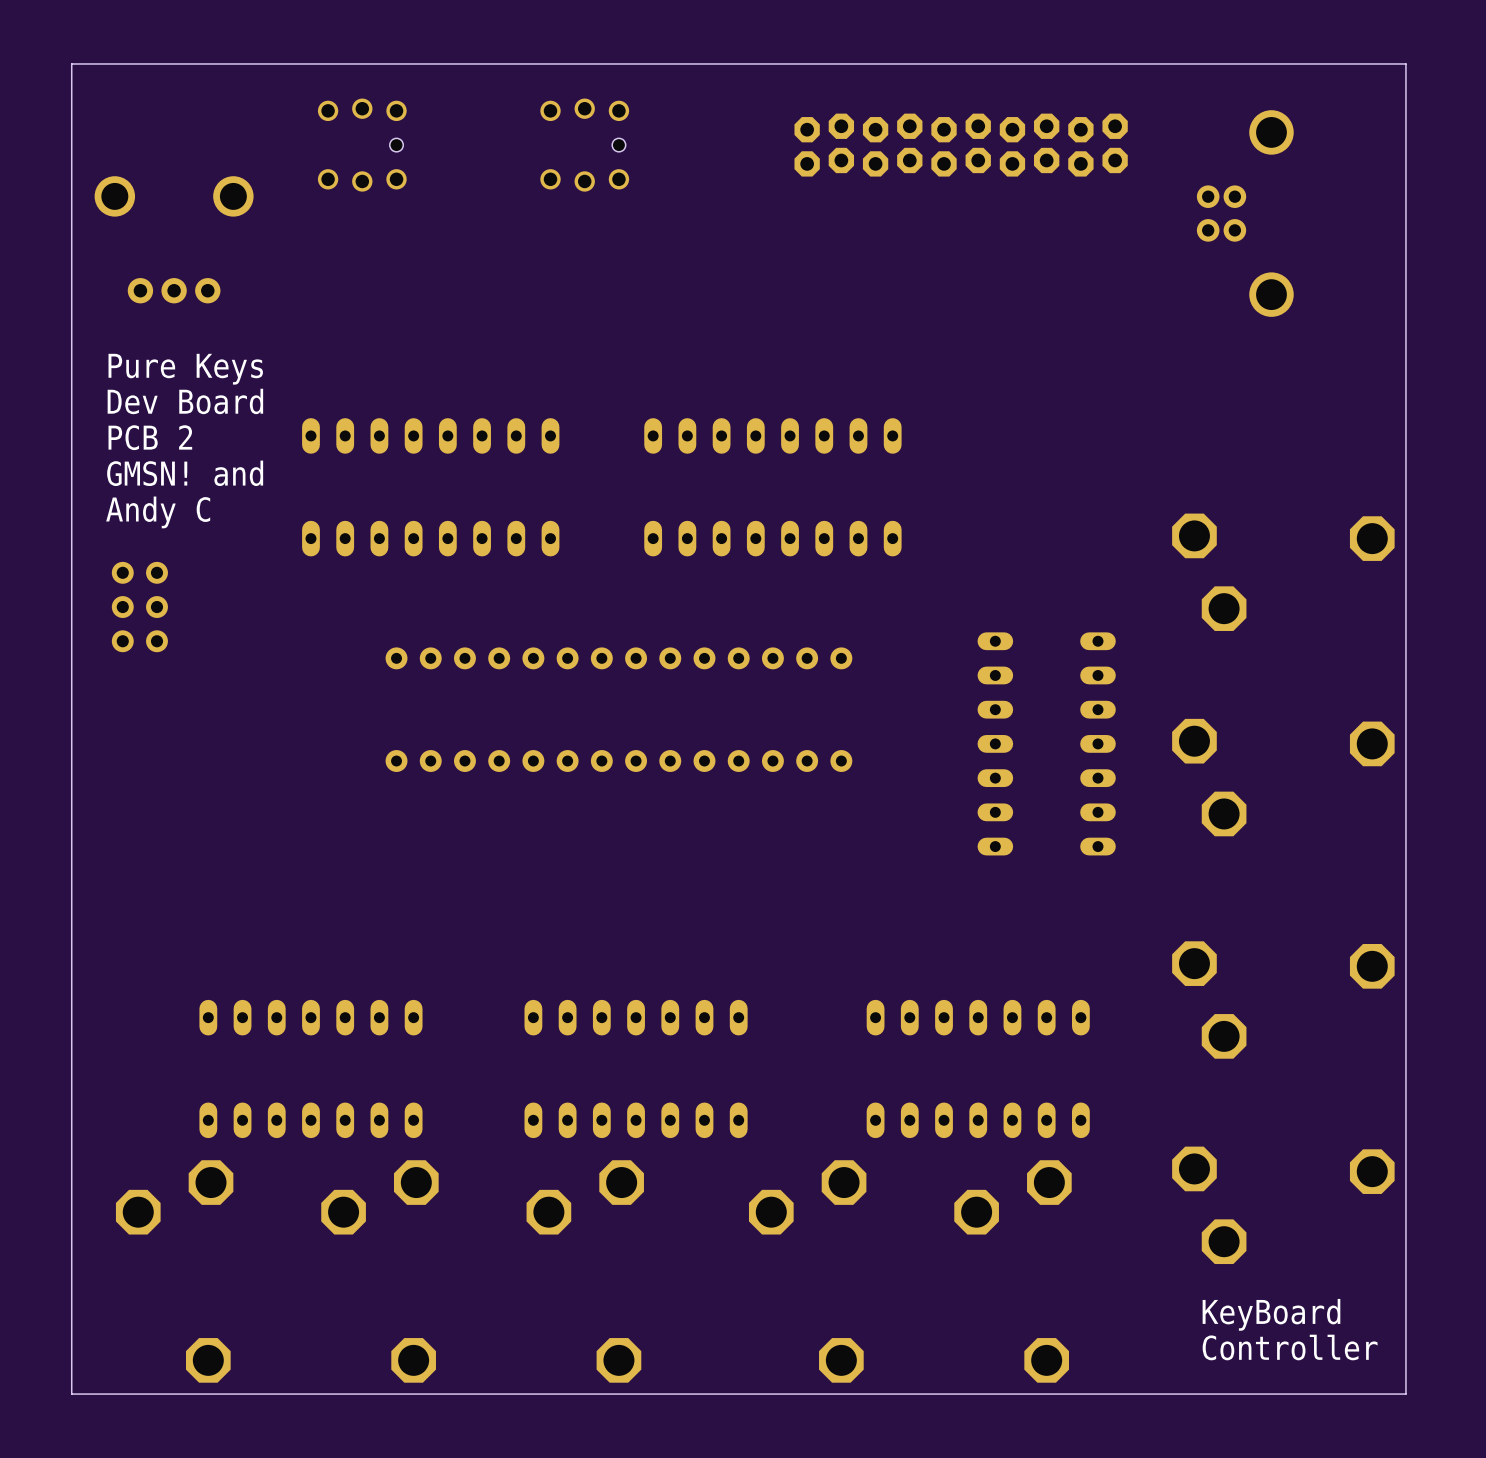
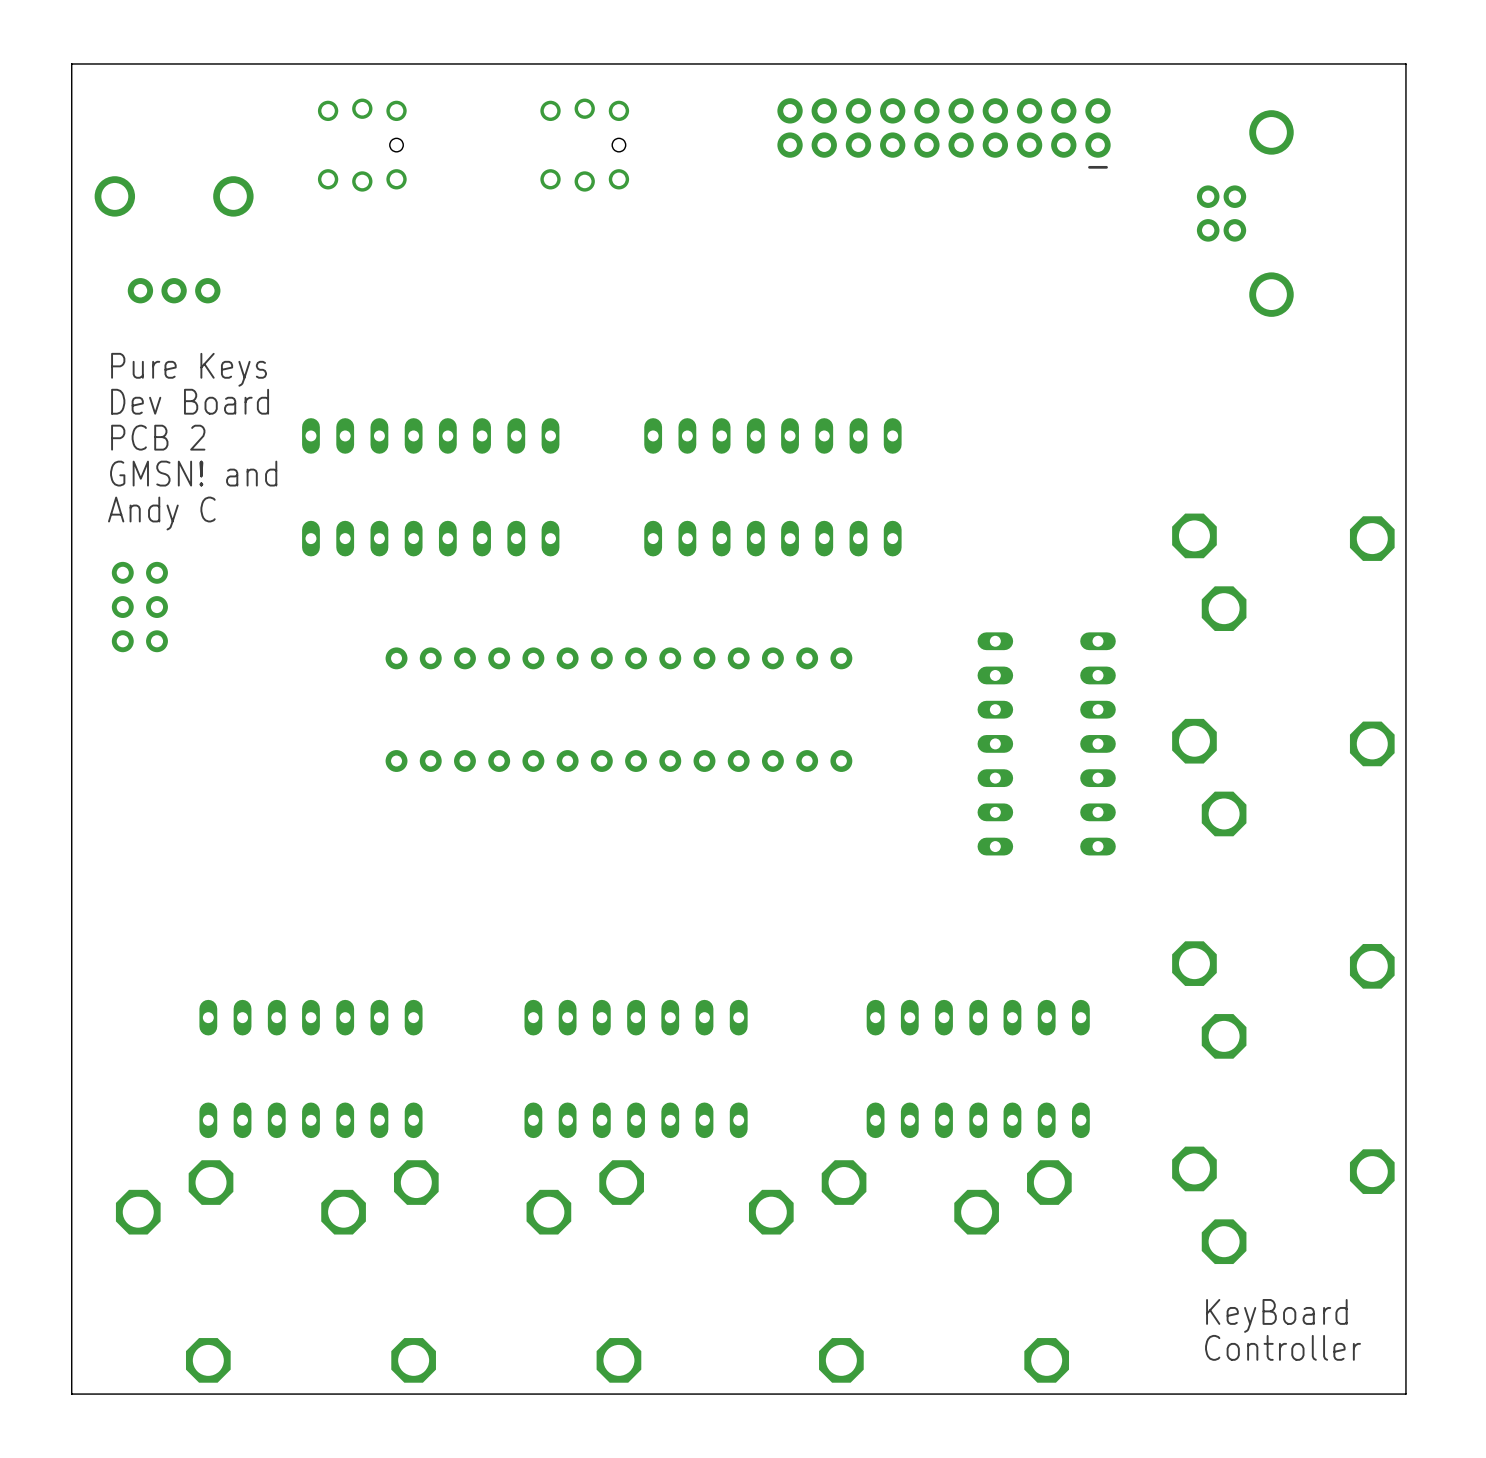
part: none -> (944, 133)
part: (961, 145) -> none

